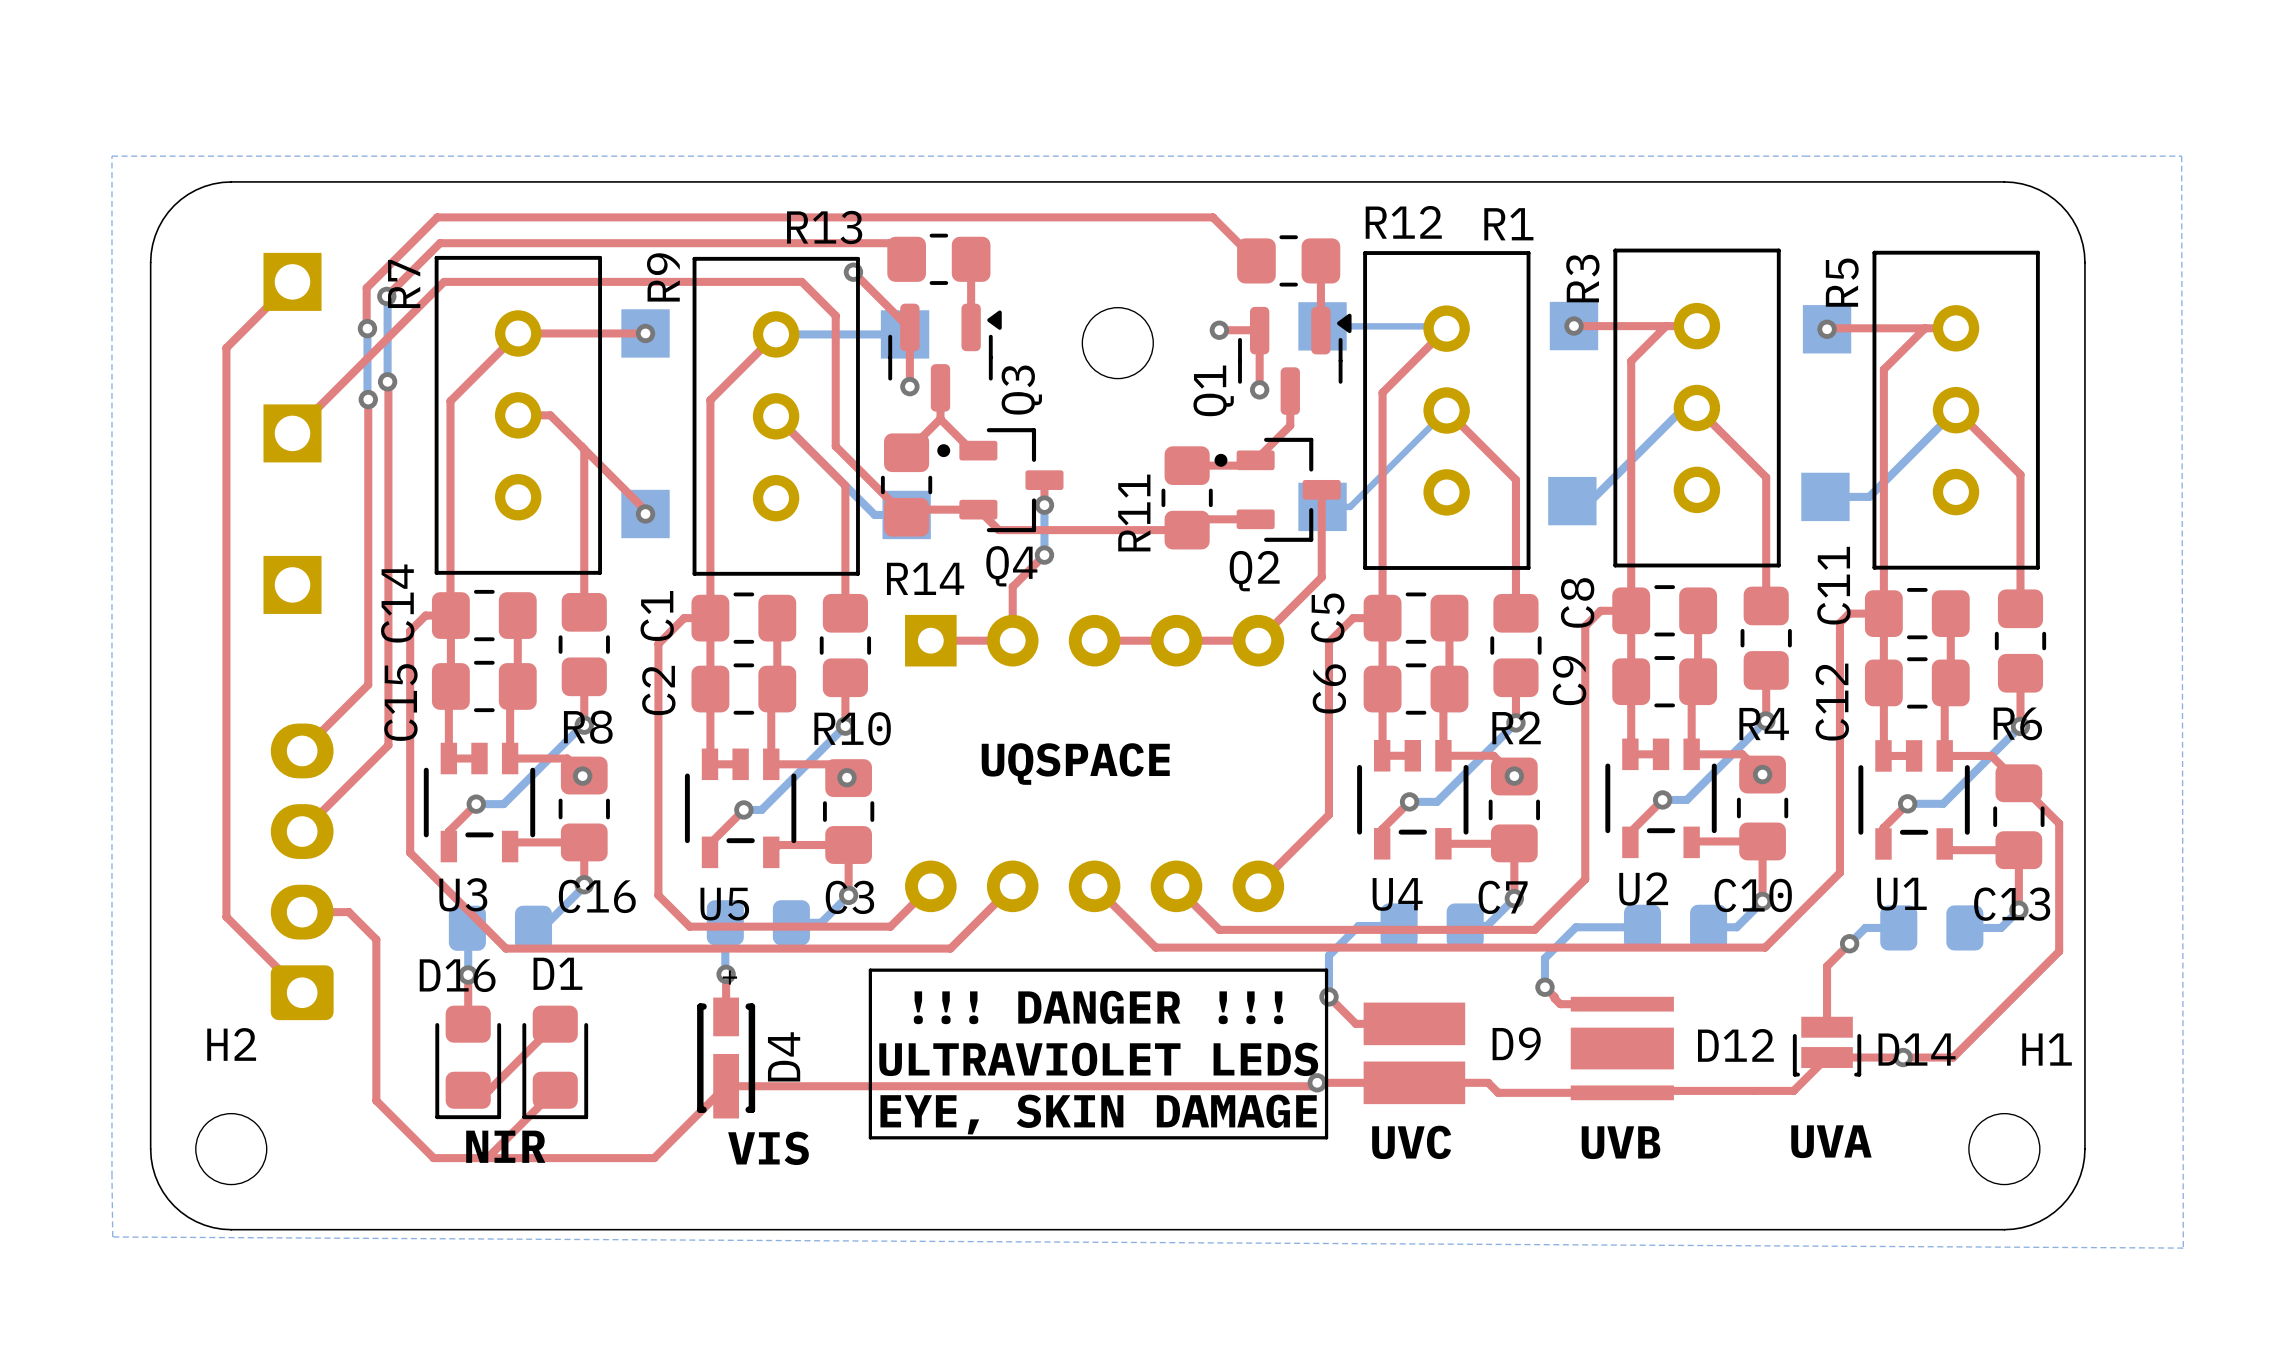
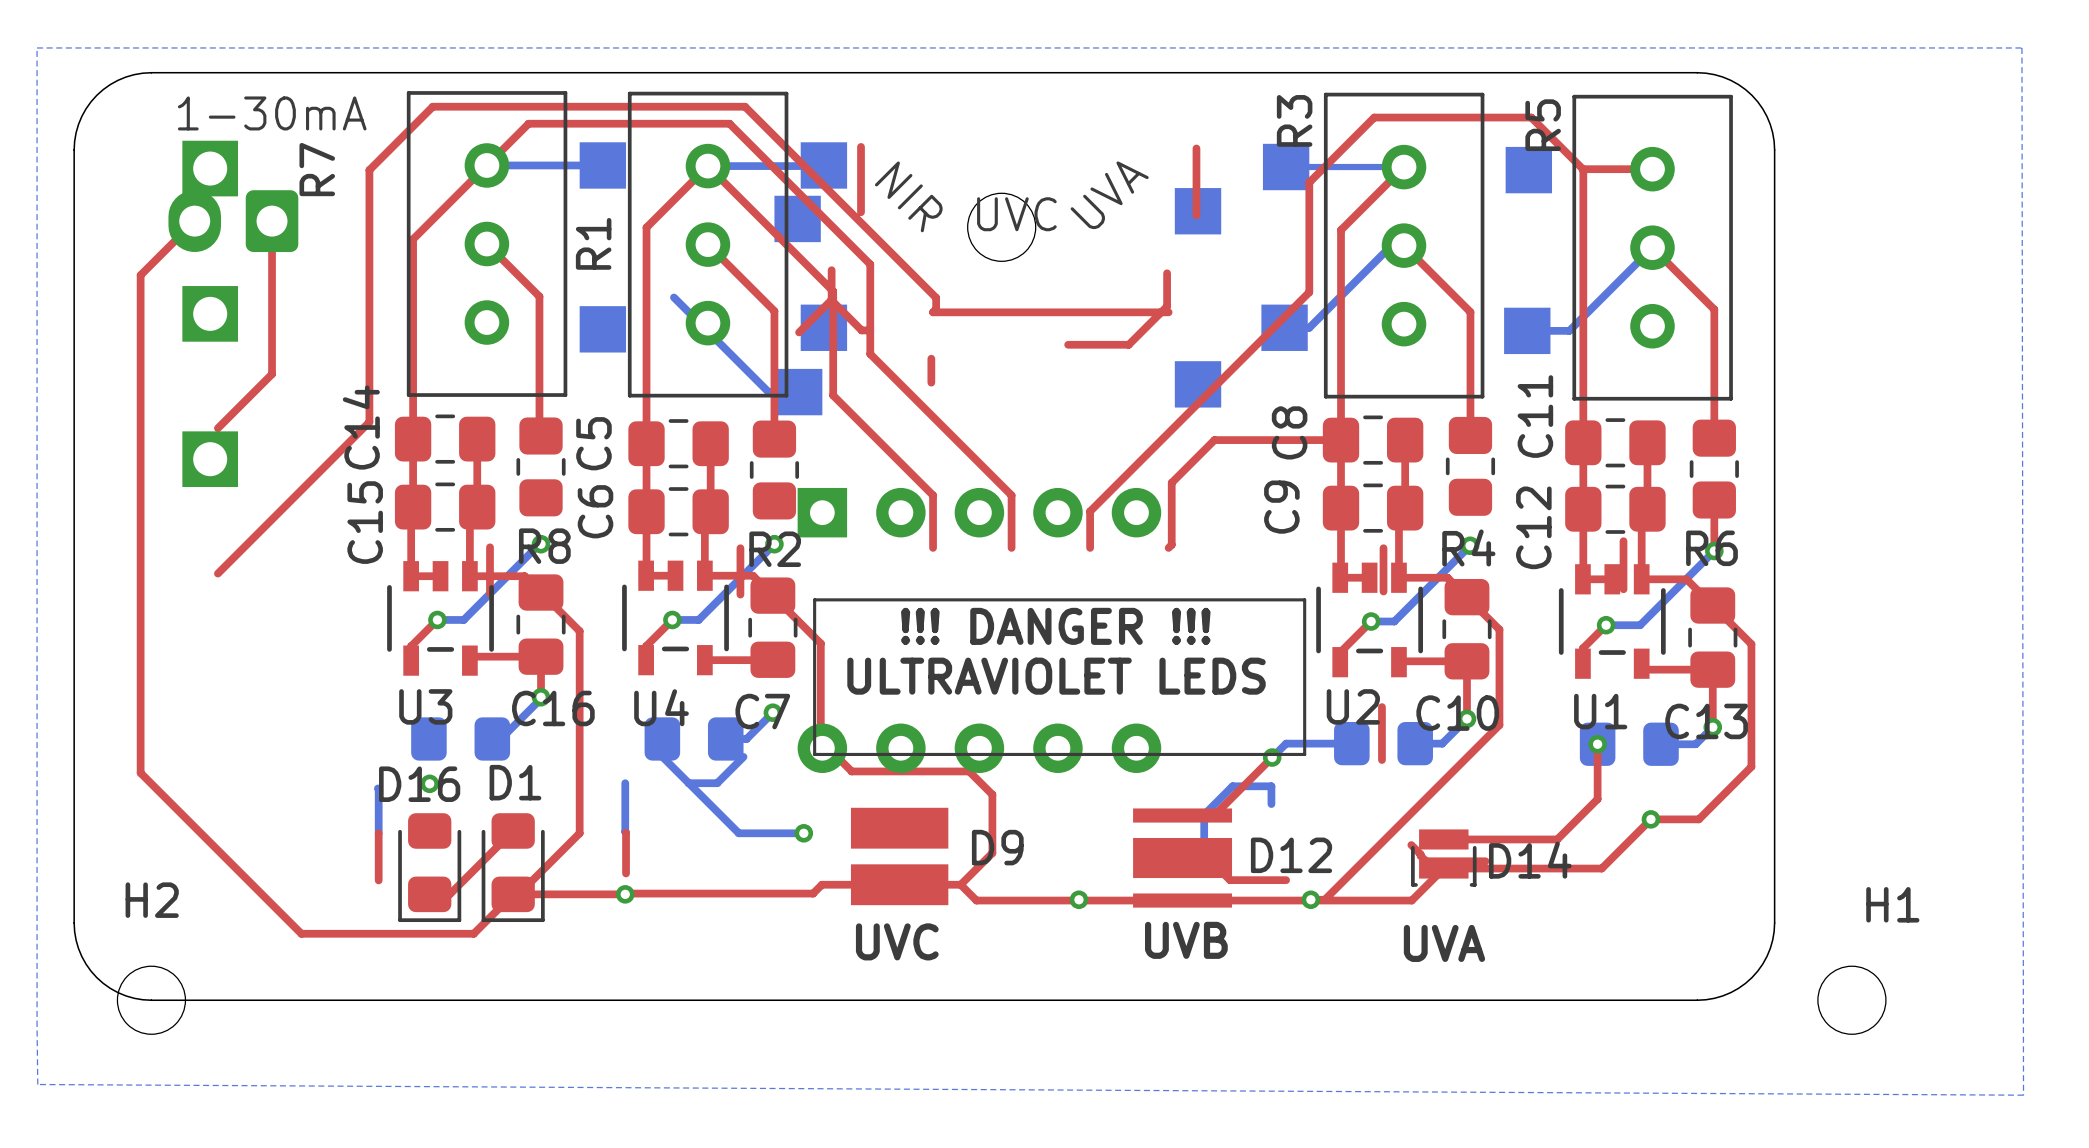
board edge: (1843, 181) (2004, 181) (2022, 183) (2039, 189) (2061, 205) (2072, 219) (2082, 244) (2084, 262) (2084, 1149) (2082, 1167) (2072, 1191) (2054, 1212) (2039, 1221) (2022, 1227) (2004, 1229) (222, 1229) (204, 1225) (188, 1217) (168, 1199) (158, 1184) (151, 1158) (150, 1068) -> (1697, 72) (1714, 74) (1730, 80) (1751, 95) (1766, 116) (1772, 132) (1774, 150) (1774, 922) (1772, 940) (1762, 964) (1751, 977) (1730, 992) (1714, 998) (1697, 1000) (151, 1000) (125, 995) (110, 988) (96, 977) (81, 956) (76, 940) (74, 922)
top track: (524, 217) (437, 217) (366, 288) (367, 328) -> (432, 106) (369, 170) (369, 422) (217, 573)
top track: (850, 217) (1212, 217) (1256, 260) -> (745, 106) (936, 297) (936, 309) (933, 312) (1168, 312)
text: none -> 1-30mA (272, 113)
R1 name rotation: 0° (1508, 224) -> 90° counterclockwise (593, 243)
R1 name position: R1 (1508, 224) -> R1 (593, 243)
top track: (906, 259) (890, 243) (440, 243) (386, 296) -> none
R13: (938, 259) -> none
R12: (1288, 260) -> none
top track: (853, 272) (909, 327) (909, 386) -> none
via: (853, 272) -> none
bottom track: none -> (486, 165) (602, 165)
part: none -> (602, 165)
bottom track: none -> (823, 165) (707, 166)
part: none -> (823, 165)
bottom track: none -> (1286, 167) (1403, 167)
part: none -> (1286, 167)
top track: none -> (1403, 167) (1341, 230) (1341, 576) (1369, 577)
top track: (292, 281) (226, 347) (226, 916) (302, 992) -> none
top track: none -> (1582, 169) (1652, 169)
part: none -> (1528, 170)
bottom track: (386, 296) (387, 381) -> none
via: (386, 296) -> none
text: none -> NIR (908, 196)
text: none -> UVA (1109, 195)
bottom track: (1322, 326) (1444, 326) (1446, 328) -> none
part: (1573, 326) -> none
via: (1573, 326) -> none
top track: (1574, 326) (1696, 326) -> none
top track: (1666, 326) (1631, 361) (1631, 752) (1661, 754) -> none
bottom track: (367, 328) (368, 399) -> none
via: (367, 328) -> none
top track: (1446, 328) (1382, 392) (1382, 755) (1412, 755) -> none
top track: (1925, 328) (1883, 369) (1883, 755) -> none
top track: (1956, 328) (1827, 329) -> none
text: none -> UVC (1016, 214)
part: (1827, 329) -> none
via: (1827, 329) -> none
top track: (1219, 330) (1259, 330) -> none
via: (1219, 330) -> none
top track: (1259, 330) (1259, 389) -> none
top track: (645, 333) (518, 333) (450, 401) (450, 615) -> none
part: (645, 333) -> none
via: (645, 333) -> none
top track: (776, 334) (710, 400) (710, 763) -> none
bottom track: (776, 334) (905, 334) -> none
top track: none -> (194, 221) (140, 275) (140, 773) (301, 933) (473, 933) (513, 894) (813, 893) (821, 884) (960, 884)
part: none -> (233, 221)
top track: none -> (272, 221) (272, 374) (217, 428)
Q3: (945, 357) -> none
top track: none -> (486, 244) (539, 296) (539, 434) (541, 435)
Q1: (1294, 360) -> none
bottom track: none -> (1403, 245) (1391, 245) (1309, 327) (1284, 327)
top track: (387, 381) (388, 745) (302, 831) -> none
via: (387, 381) -> none
via: (909, 386) -> none
via: (1259, 389) -> none
top track: (368, 399) (368, 684) (302, 750) -> none
via: (368, 399) -> none
top track: (1696, 408) (1766, 477) (1766, 605) -> (1403, 245) (1470, 312) (1470, 435)
bottom track: (1696, 408) (1683, 408) (1590, 501) (1572, 501) -> none
R3 position: (1697, 408) -> (1404, 245)
top track: (1446, 410) (1515, 479) (1515, 613) -> (707, 244) (774, 311) (774, 439)
bottom track: (1446, 410) (1350, 506) (1322, 506) -> none
R1 position: (1446, 410) -> (708, 244)
top track: (1956, 410) (2020, 474) (2020, 608) -> (1652, 247) (1714, 309) (1714, 438)
bottom track: (1956, 410) (1869, 496) (1825, 496) -> (1652, 247) (1569, 330) (1527, 330)
R5 position: (1956, 410) -> (1652, 247)
top track: (518, 415) (550, 415) (645, 510) (645, 514) -> none
R7 position: (518, 415) -> (487, 244)
top track: (776, 416) (845, 485) (845, 613) -> none
R9: (776, 416) -> none
top track: (292, 433) (444, 281) (801, 281) (835, 315) (835, 446) (906, 517) (914, 509) (978, 509) (998, 530) (1187, 530) (1197, 519) (1255, 519) -> none
part: none -> (823, 327)
part: none -> (1284, 327)
top track: (584, 449) (584, 612) (582, 610) -> none
part: none -> (602, 329)
part: none -> (1527, 330)
Q4: (1000, 480) -> none
R14: (906, 484) -> none
Q2: (1277, 489) -> none
top track: (1321, 489) (1321, 577) (1258, 640) (1094, 640) -> none
part: (1825, 496) -> none
R11: (1187, 497) -> none
part: (1572, 501) -> none
bottom track: (1044, 505) (1044, 555) -> none
via: (1044, 505) -> none
part: (645, 514) -> none
via: (645, 514) -> none
top track: (1044, 555) (1012, 586) (1012, 640) (930, 640) -> none
via: (1044, 555) -> none
top track: none -> (477, 439) (477, 507) (469, 514) (469, 576) (524, 576) (579, 631) (579, 833) (518, 894)
top track: none -> (1341, 440) (1214, 440) (1171, 482) (1171, 544) (1168, 547)
top track: none -> (1405, 440) (1405, 508) (1398, 514) (1398, 577) (1447, 577) (1499, 629) (1499, 725) (1324, 899) (1310, 899)
top track: none -> (1647, 442) (1647, 509) (1641, 515) (1641, 579) (1686, 579) (1751, 644) (1751, 766) (1698, 819) (1650, 819) (1601, 868) (1443, 868) (1411, 900) (1310, 899)
top track: none -> (710, 443) (710, 511) (704, 517) (704, 575) (753, 575) (820, 643) (820, 740) (851, 771) (969, 771) (992, 794) (992, 853) (960, 884)
top track: (1631, 610) (1600, 610) (1585, 626) (1585, 879) (1534, 929) (1219, 929) (1176, 886) -> none
C8 position: (1664, 610) -> (1373, 440)
top track: (1698, 610) (1698, 681) (1691, 688) (1691, 754) (1742, 754) (1762, 774) -> none
top track: (1883, 613) (1849, 613) (1839, 622) (1839, 872) (1765, 947) (1155, 947) (1094, 886) -> none
C11 position: (1917, 613) -> (1615, 442)
top track: (1950, 613) (1950, 682) (1944, 688) (1944, 755) (1991, 755) (2059, 823) (2059, 951) (1953, 1057) (1827, 1057) (1793, 1090) (1498, 1092) (1488, 1082) (1317, 1082) (1313, 1086) (726, 1086) (654, 1158) (433, 1158) (376, 1100) (376, 939) (348, 912) (302, 912) -> none
C14 position: (484, 615) -> (445, 439)
top track: (517, 615) (517, 686) (510, 694) (510, 758) (567, 758) (582, 776) (584, 775) -> none
top track: (710, 618) (684, 618) (658, 643) (658, 895) (689, 926) (890, 926) (930, 886) -> none
C1: (743, 618) -> none
top track: (777, 618) (777, 689) (771, 695) (771, 764) (834, 764) (848, 777) -> none
top track: (1382, 618) (1353, 618) (1328, 642) (1328, 814) (1258, 886) -> none
C5 position: (1416, 618) -> (678, 443)
top track: (1449, 618) (1449, 689) (1443, 695) (1443, 755) (1493, 755) (1513, 776) -> none
R4 position: (1766, 638) -> (1470, 466)
R6 position: (2020, 641) -> (1714, 469)
R8 position: (584, 644) -> (541, 466)
R10: (845, 645) -> none
R2 position: (1515, 645) -> (774, 470)
via: none -> (541, 544)
via: none -> (774, 544)
top track: (2020, 673) (2020, 726) -> (1714, 499) (1714, 551)
via: none -> (1470, 545)
top track: none -> (933, 547) (933, 495) (833, 395) (833, 291) (707, 166) (646, 227) (646, 575) (675, 575)
top track: none -> (1011, 547) (1011, 495) (870, 354) (870, 264) (729, 123) (528, 123) (413, 239) (413, 507) (411, 509) (411, 576) (440, 576)
top track: none -> (1090, 547) (1090, 511) (1309, 292) (1309, 182) (1374, 117) (1531, 117) (1583, 169) (1583, 578)
via: none -> (1714, 551)
C9 position: (1664, 681) -> (1373, 508)
C12 position: (1917, 682) -> (1615, 509)
C15 position: (484, 686) -> (445, 507)
C2: (743, 689) -> none
C6 position: (1416, 689) -> (678, 511)
bottom track: (1765, 720) (1686, 799) (1662, 799) -> (1470, 545) (1394, 621) (1371, 621)
via: (1765, 720) -> none
bottom track: (1515, 722) (1436, 801) (1409, 801) -> (774, 544) (698, 619) (672, 619)
via: (1515, 722) -> none
bottom track: (584, 725) (503, 804) (476, 804) -> (541, 544) (463, 619) (437, 619)
via: (584, 725) -> none
bottom track: (845, 726) (761, 809) (743, 809) -> none
via: (845, 726) -> none
bottom track: (2020, 726) (1943, 803) (1907, 803) -> (1714, 551) (1640, 625) (1606, 625)
via: (2020, 726) -> none
line: none -> (814, 599) (1304, 599) (1304, 754) (814, 754) (814, 599)
via: none -> (437, 619)
via: none -> (672, 619)
via: none -> (1371, 621)
top track: (1883, 755) (1914, 755) -> (1582, 579) (1612, 579)
top track: (479, 758) (448, 758) (450, 615) (425, 615) (410, 631) (410, 852) (505, 948) (950, 948) (1012, 886) -> none
top track: (710, 764) (740, 764) -> none
text: UQSPACE (1075, 764) -> none
via position: (1762, 774) -> (1606, 625)
via: (582, 776) -> none
via: (1514, 776) -> none
via: (847, 777) -> none
U2 position: (1661, 798) -> (1369, 619)
U4 position: (1412, 799) -> (675, 617)
top track: (1662, 799) (1630, 832) (1630, 842) -> (1371, 621) (1340, 652) (1340, 662)
via: (1662, 799) -> none
U1 position: (1914, 799) -> (1612, 621)
top track: (1409, 801) (1382, 829) (1382, 843) -> (672, 619) (646, 646) (646, 660)
via: (1409, 801) -> none
U3 position: (479, 802) -> (440, 618)
top track: (1907, 803) (1883, 828) (1883, 839) -> (1606, 625) (1582, 648) (1582, 659)
via: (1907, 803) -> none
top track: (476, 804) (448, 831) (448, 846) -> (437, 619) (411, 646) (411, 660)
via: (476, 804) -> none
C16 position: (584, 808) -> (541, 624)
U5: (740, 808) -> none
C10 position: (1762, 808) -> (1466, 629)
top track: (743, 809) (710, 843) (710, 852) -> none
via: (743, 809) -> none
C7 position: (1514, 809) -> (772, 627)
C3: (848, 811) -> none
C13 position: (2018, 816) -> (1712, 637)
via: none -> (541, 697)
top track: (1691, 842) (1762, 841) (1762, 901) -> (1398, 662) (1466, 661) (1466, 718)
top track: (1443, 843) (1513, 843) -> (704, 660) (772, 660)
top track: (1944, 843) (1950, 850) (2018, 850) (2018, 910) -> (1641, 663) (1647, 669) (1712, 669) (1712, 727)
top track: (510, 846) (514, 842) (584, 842) (584, 884) -> (469, 660) (473, 656) (541, 656) (541, 697)
via: none -> (772, 712)
top track: (771, 852) (778, 845) (848, 845) (848, 895) -> none
via: none -> (1466, 718)
via: none -> (1712, 727)
part: (302, 871) -> none
bottom track: none -> (662, 738) (662, 756) (738, 833) (803, 833)
bottom track: none -> (1351, 743) (1286, 743) (1272, 757)
part: none -> (1383, 743)
top track: none -> (1597, 744) (1597, 799) (1557, 839) (1443, 839)
part: none -> (1629, 744)
bottom track: (584, 884) (542, 928) (533, 928) -> (541, 697) (500, 738) (492, 738)
via: (584, 884) -> none
via: (848, 895) -> none
top track: none -> (1272, 757) (1214, 815) (1182, 815)
via: none -> (1272, 757)
bottom track: (1514, 898) (1486, 926) (1465, 926) -> (772, 712) (746, 738) (725, 738)
via: (1514, 898) -> none
bottom track: (1762, 901) (1736, 927) (1708, 927) -> (1466, 718) (1442, 743) (1415, 743)
via position: (1762, 901) -> (1597, 744)
bottom track: (2018, 910) (2001, 927) (1964, 927) -> (1712, 727) (1695, 744) (1661, 744)
via: (2018, 910) -> none
part position: (758, 922) -> (694, 738)
via: none -> (429, 783)
part: (1432, 926) -> none
bottom track: (1642, 927) (1575, 927) (1544, 958) (1544, 987) -> none
part: (1675, 927) -> none
bottom track: (1898, 927) (1865, 927) (1849, 943) -> none
part: (1931, 927) -> none
part position: (500, 928) -> (460, 738)
top track: (1849, 943) (1827, 966) (1827, 1027) -> none
via: (1849, 943) -> none
via: none -> (1650, 819)
line: (870, 970) (1326, 970) (1326, 1137) (870, 1137) (870, 970) -> none
via position: (726, 974) -> (625, 894)
via: (468, 975) -> none
via: none -> (803, 833)
via: (1544, 987) -> none
via: (1328, 996) -> none
text position: !!! DANGER !!! (1098, 1007) -> !!! DANGER !!! (1055, 626)
top track: (555, 1024) (489, 1090) (468, 1090) -> (513, 830) (449, 894) (429, 894)
top track: none -> (960, 884) (976, 900) (1310, 899)
via: none -> (1078, 899)
via: none -> (1310, 899)
D14 position: (1827, 1046) -> (1443, 858)
D12 position: (1622, 1048) -> (1182, 858)
D9 position: (1414, 1053) -> (899, 856)
via: (1903, 1057) -> none
D4: (726, 1058) -> none
text position: ULTRAVIOLET LEDS (1098, 1059) -> ULTRAVIOLET LEDS (1056, 676)
D16 position: (468, 1062) -> (429, 867)
D1 position: (555, 1062) -> (513, 867)
via: (1317, 1082) -> none
top track: (555, 1090) (487, 1158) -> none
text: EYE, SKIN DAMAGE (1098, 1114) -> none
D14 value position: UVA (1831, 1141) -> UVA (1444, 943)
D12 value position: UVB (1620, 1142) -> UVB (1186, 940)
text: NIR (505, 1146) -> none
text: VIS (768, 1148) -> none

